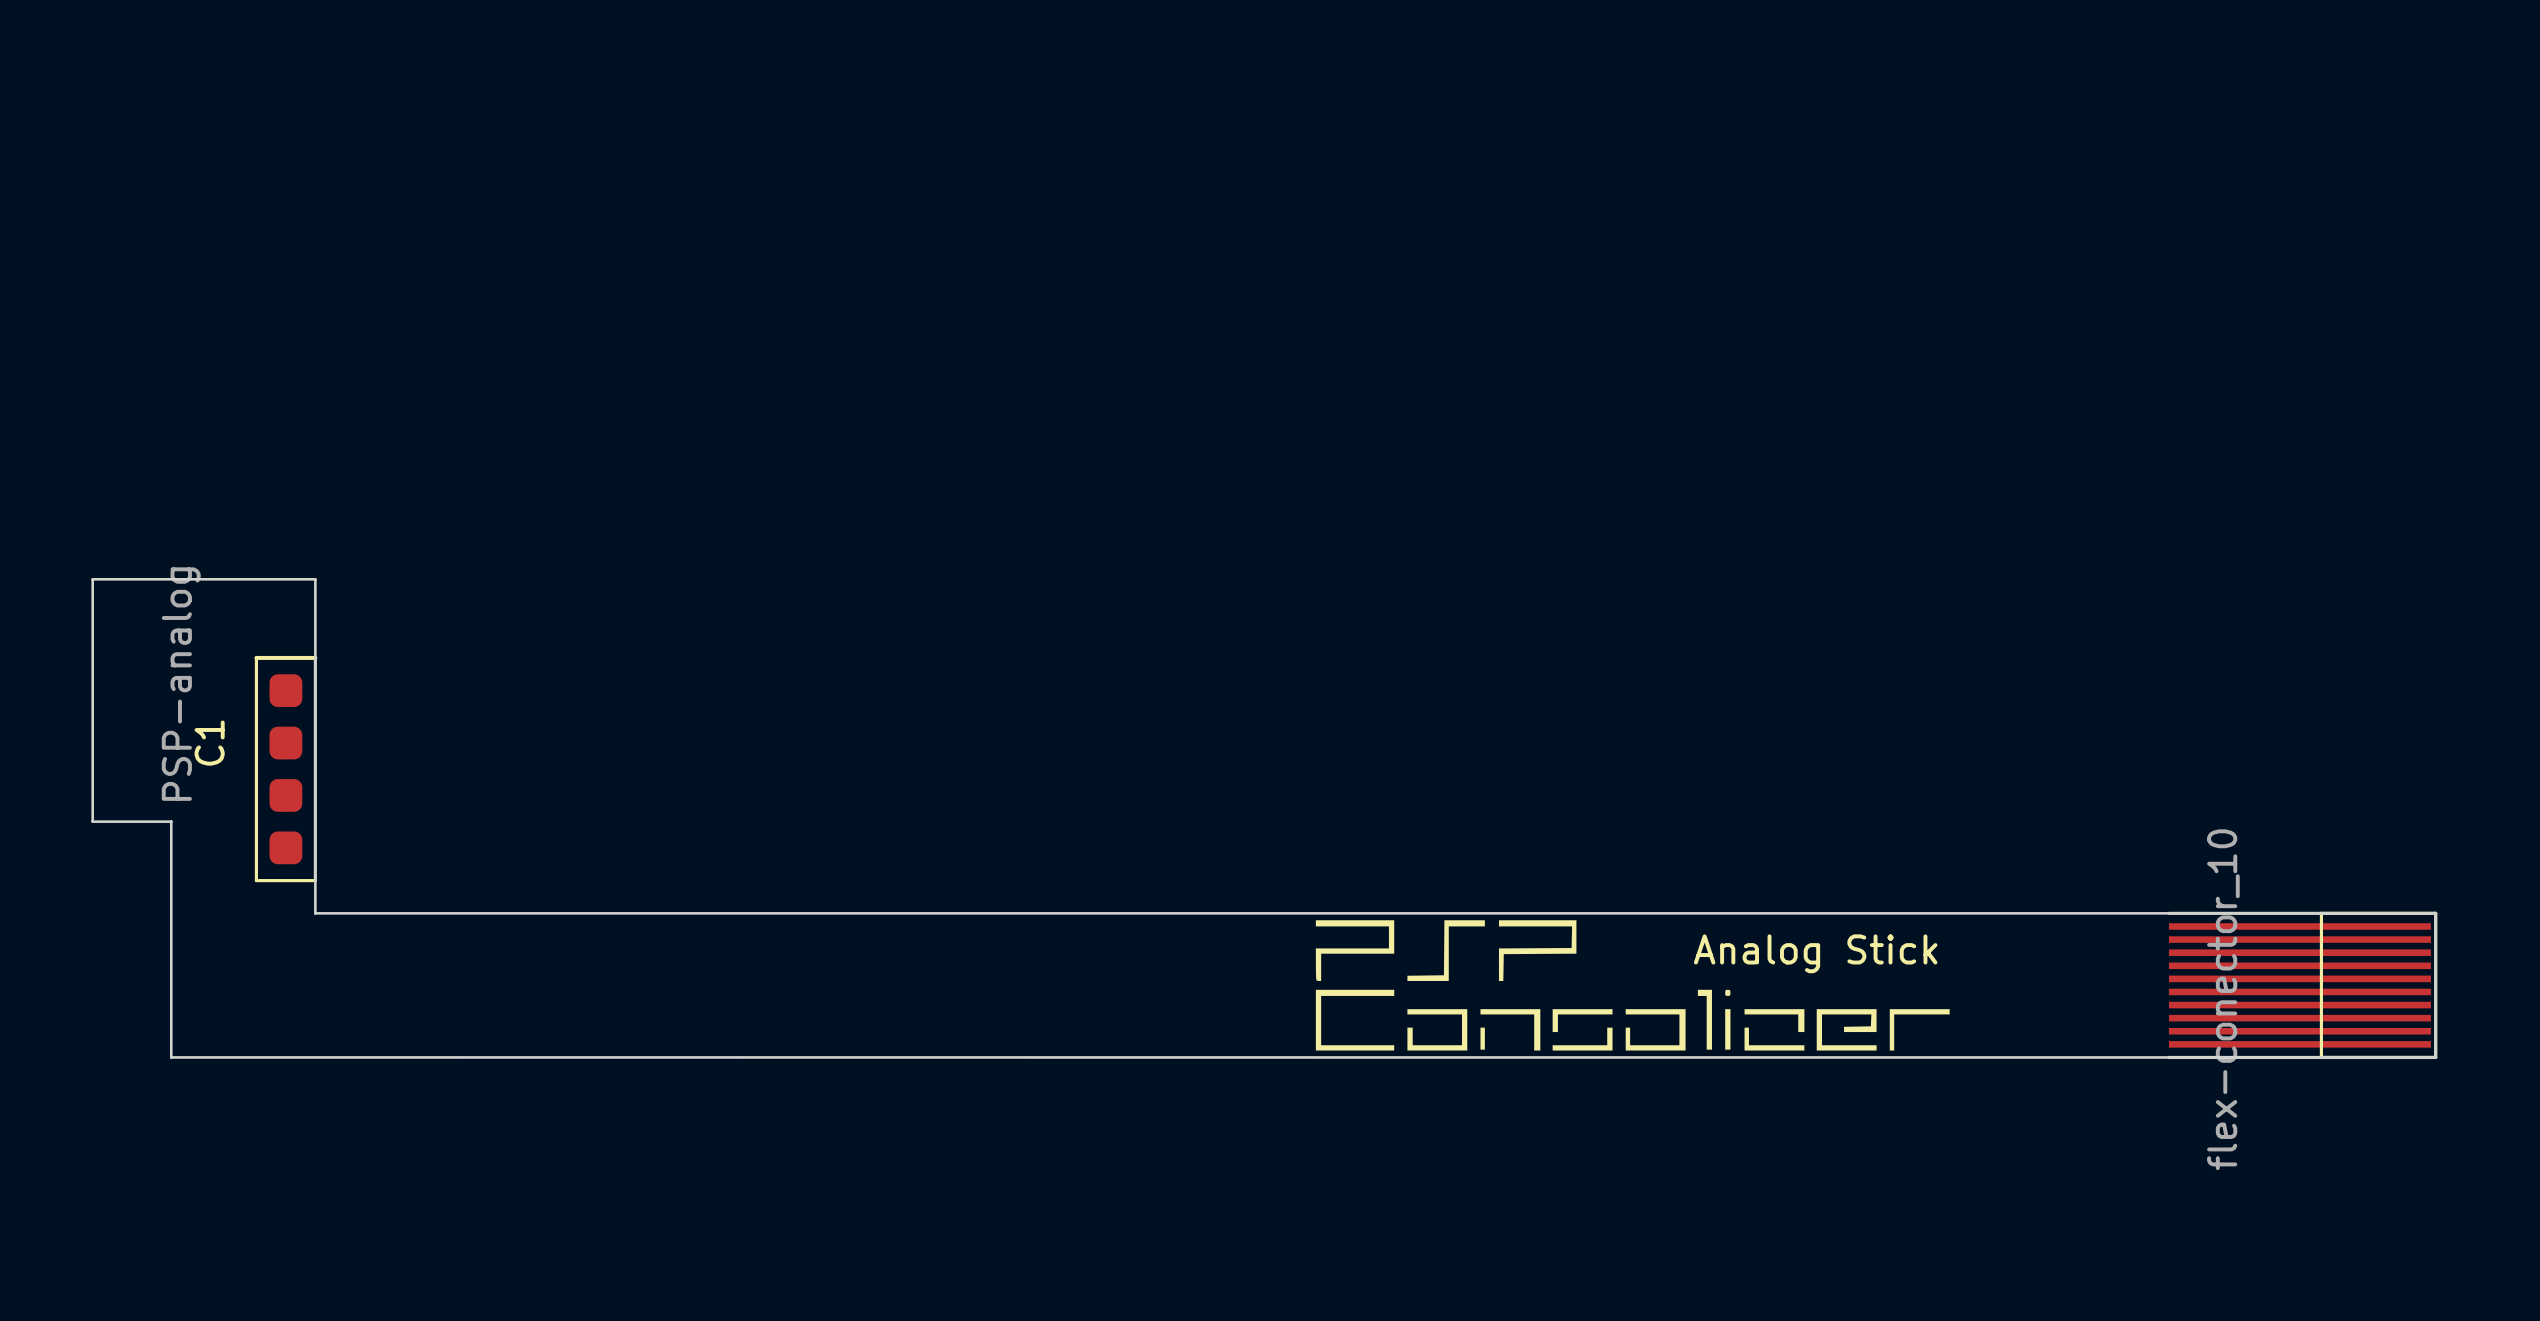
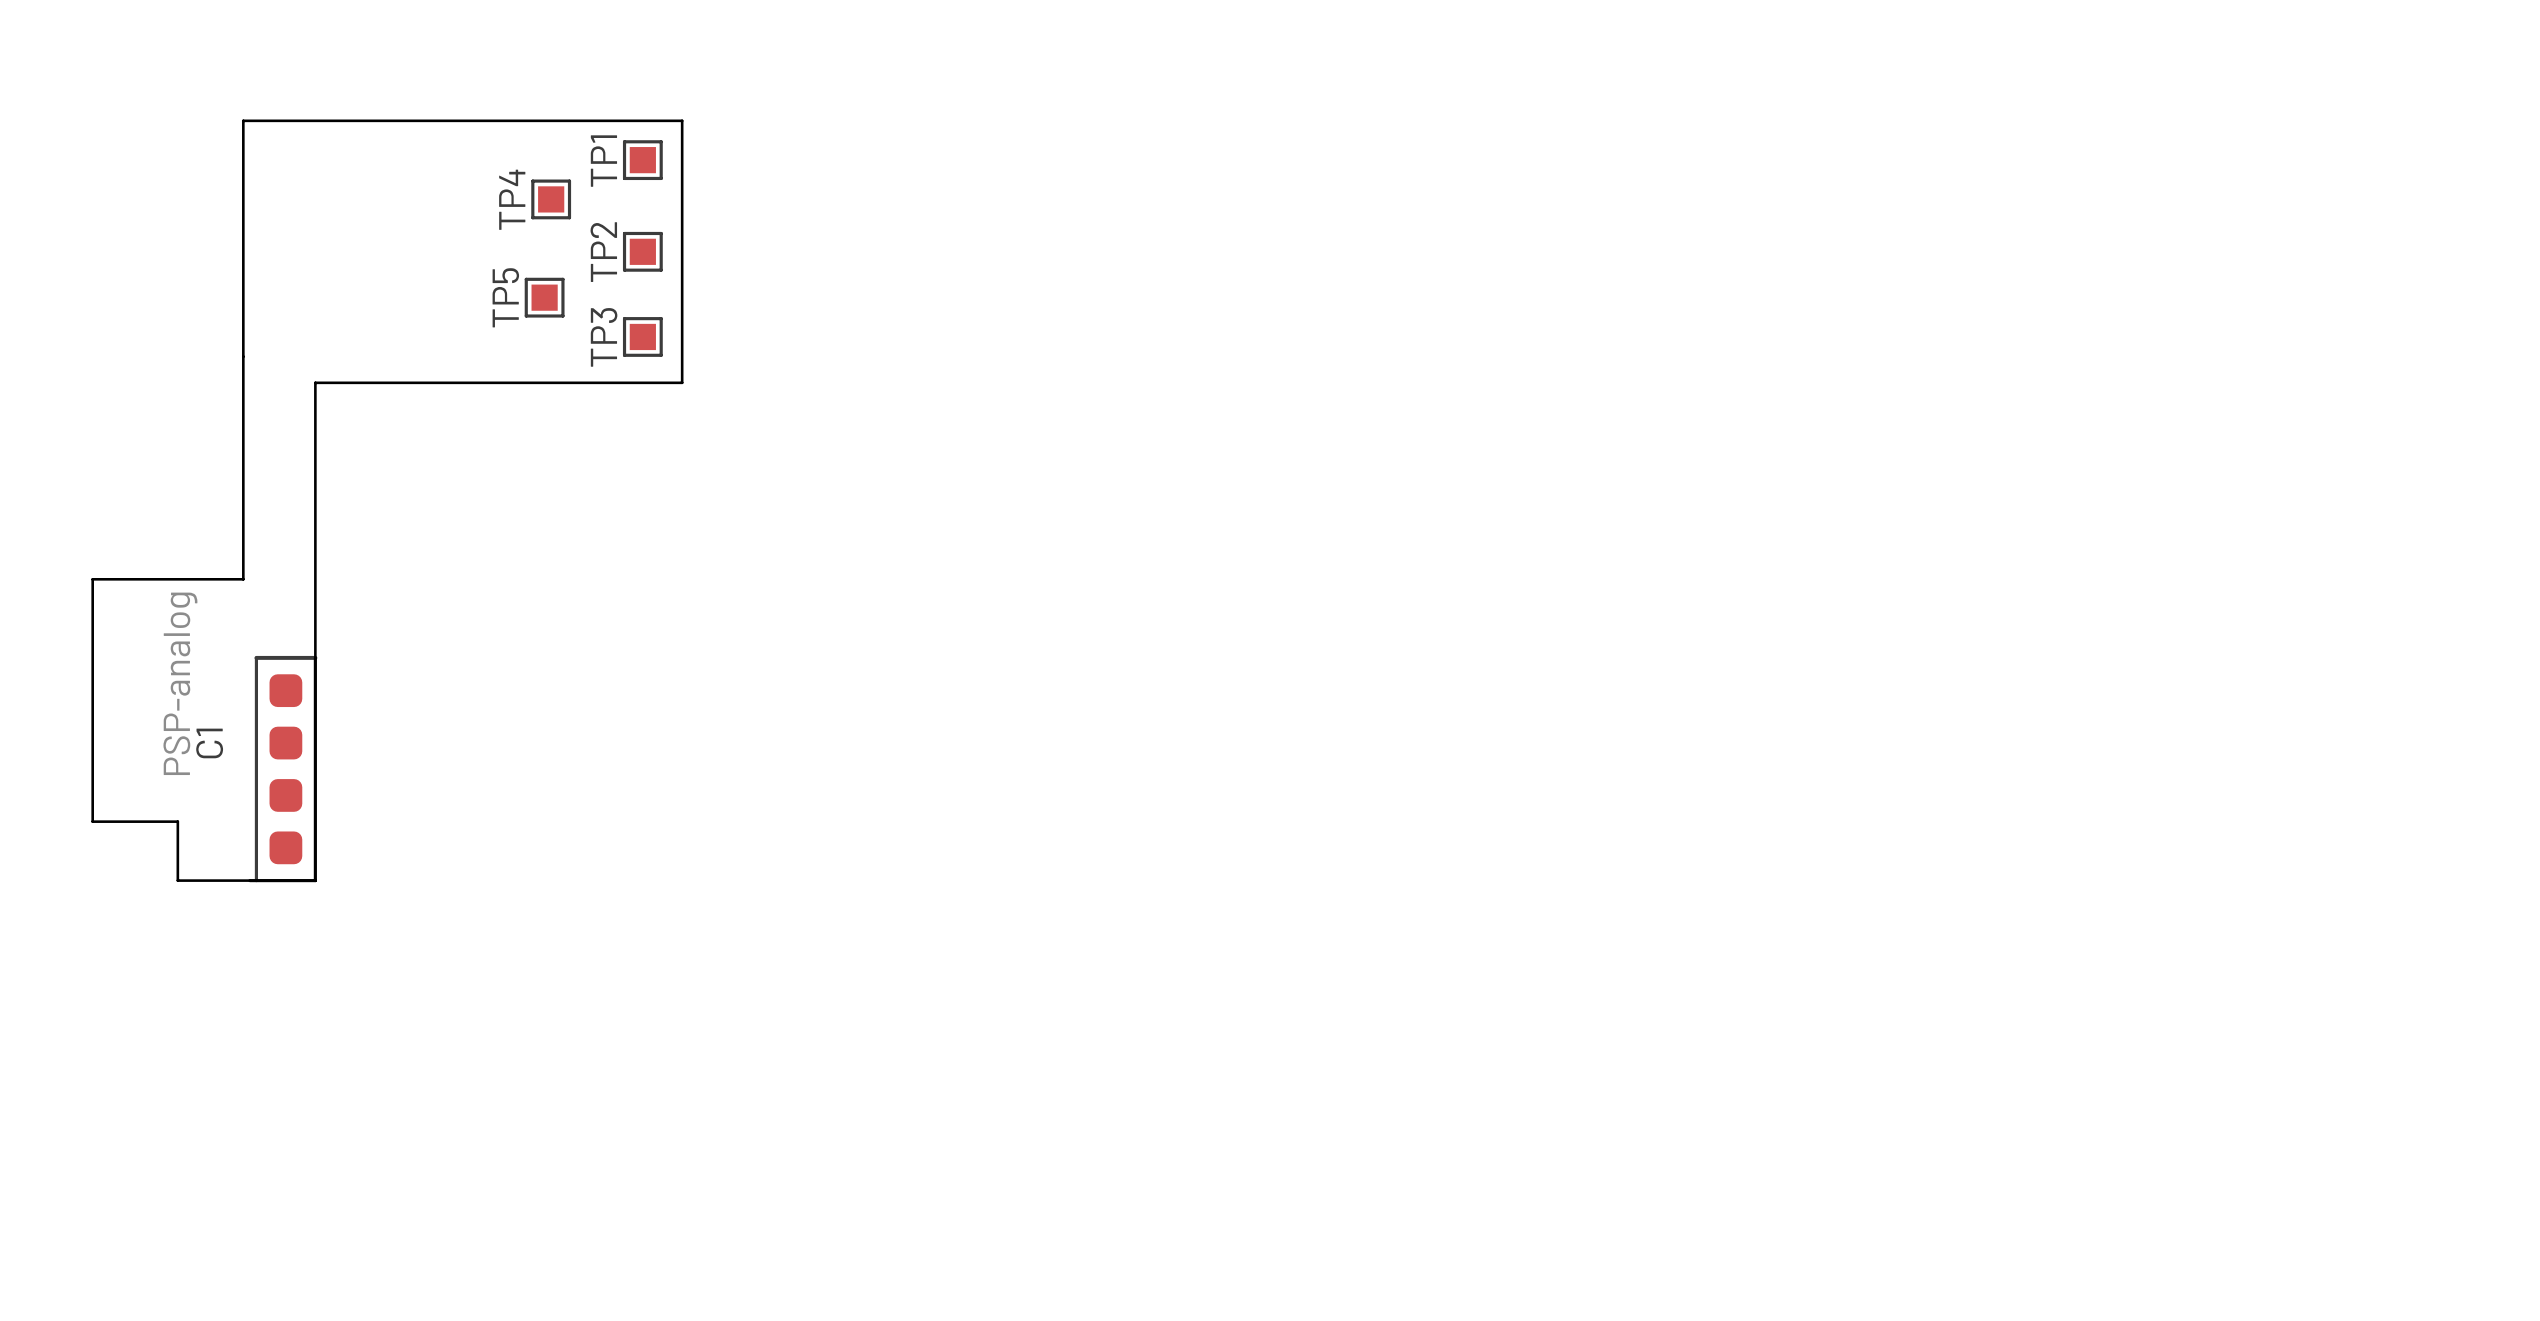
TP1: none -> (642, 160)
TP4: none -> (551, 199)
TP2: none -> (642, 251)
TP5: none -> (544, 297)
TP3: none -> (642, 336)
board edge: (243, 579) (315, 579) -> (243, 579) (243, 120) (682, 120) (682, 382) (315, 382) (315, 579)
C1 footprint: [254, 656, 317, 883] -> [248, 656, 317, 883]
board edge: (171, 821) (171, 1057) (2168, 1057) -> (171, 821) (177, 821) (177, 880) (249, 880)
board edge: (315, 880) (315, 913) (2168, 913) -> none
drawing: [1315, 920, 1950, 1051] -> none
text: Analog Stick (1815, 953) -> none
part: flex-conector_10 (2302, 985) -> none

